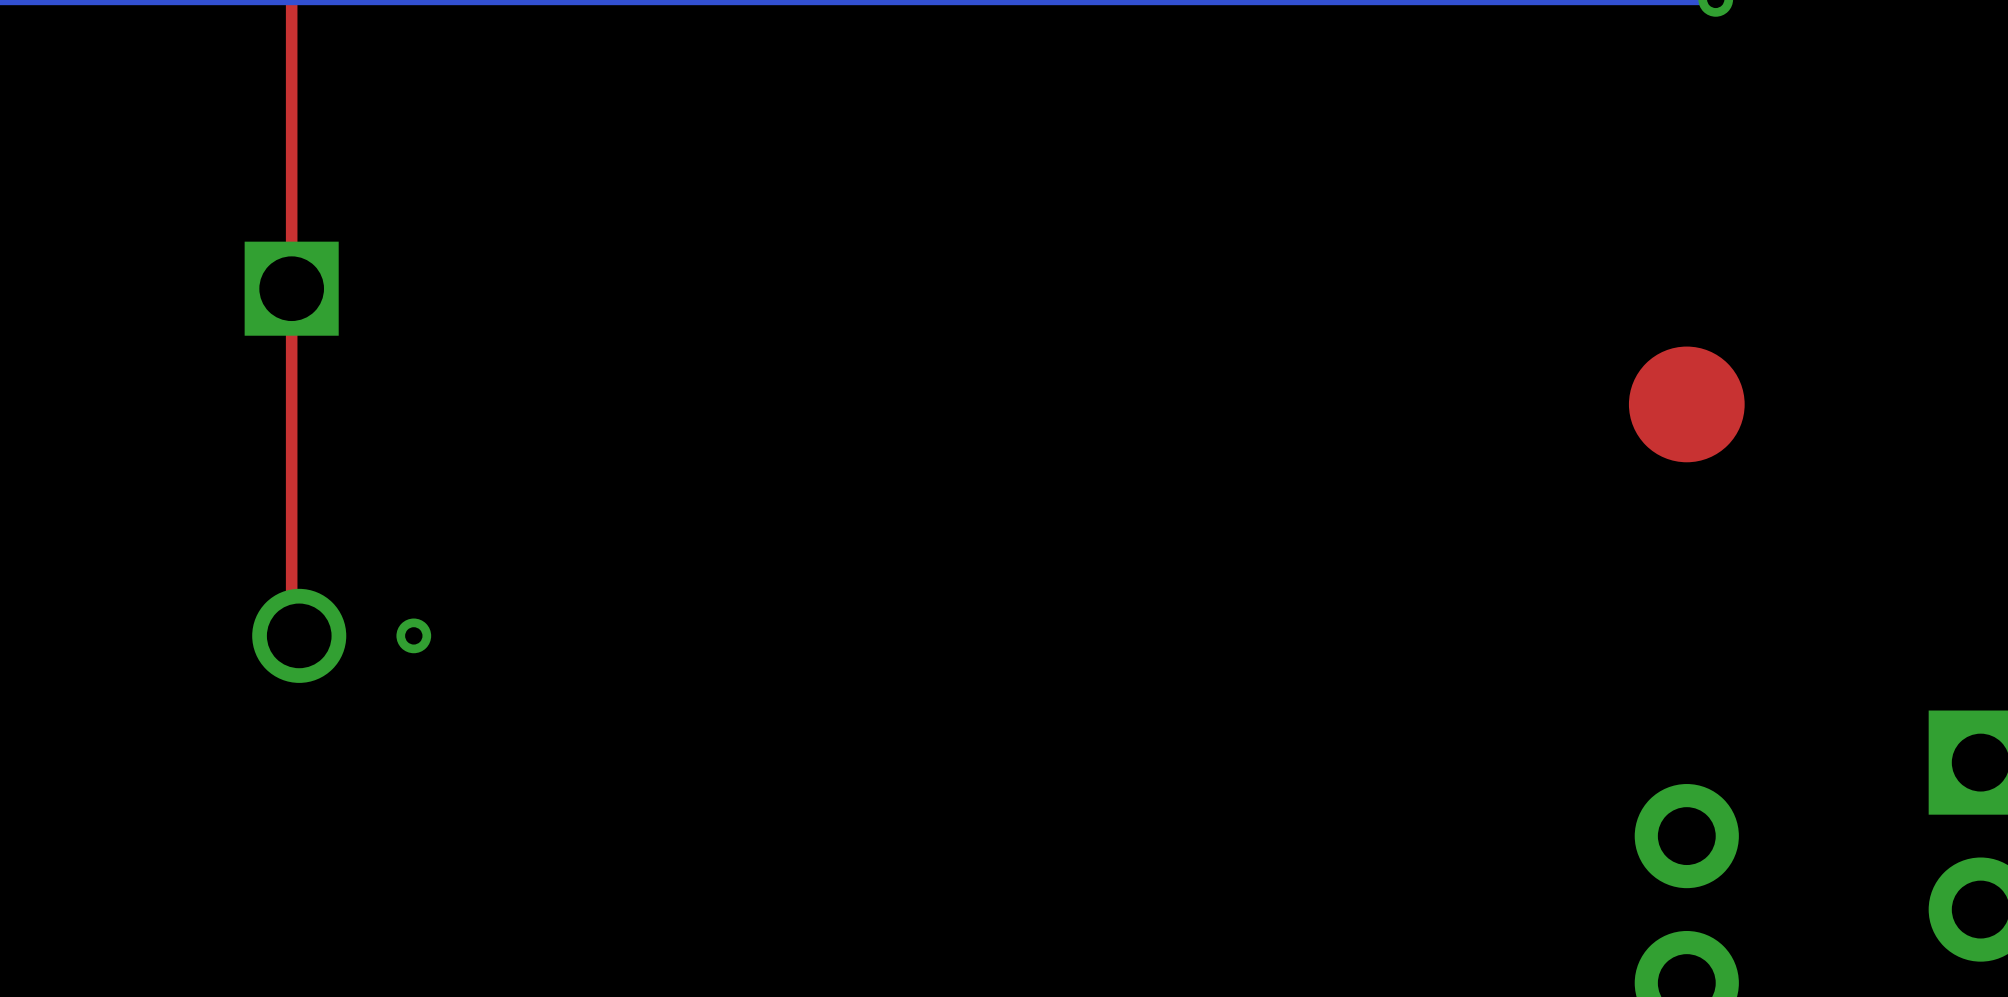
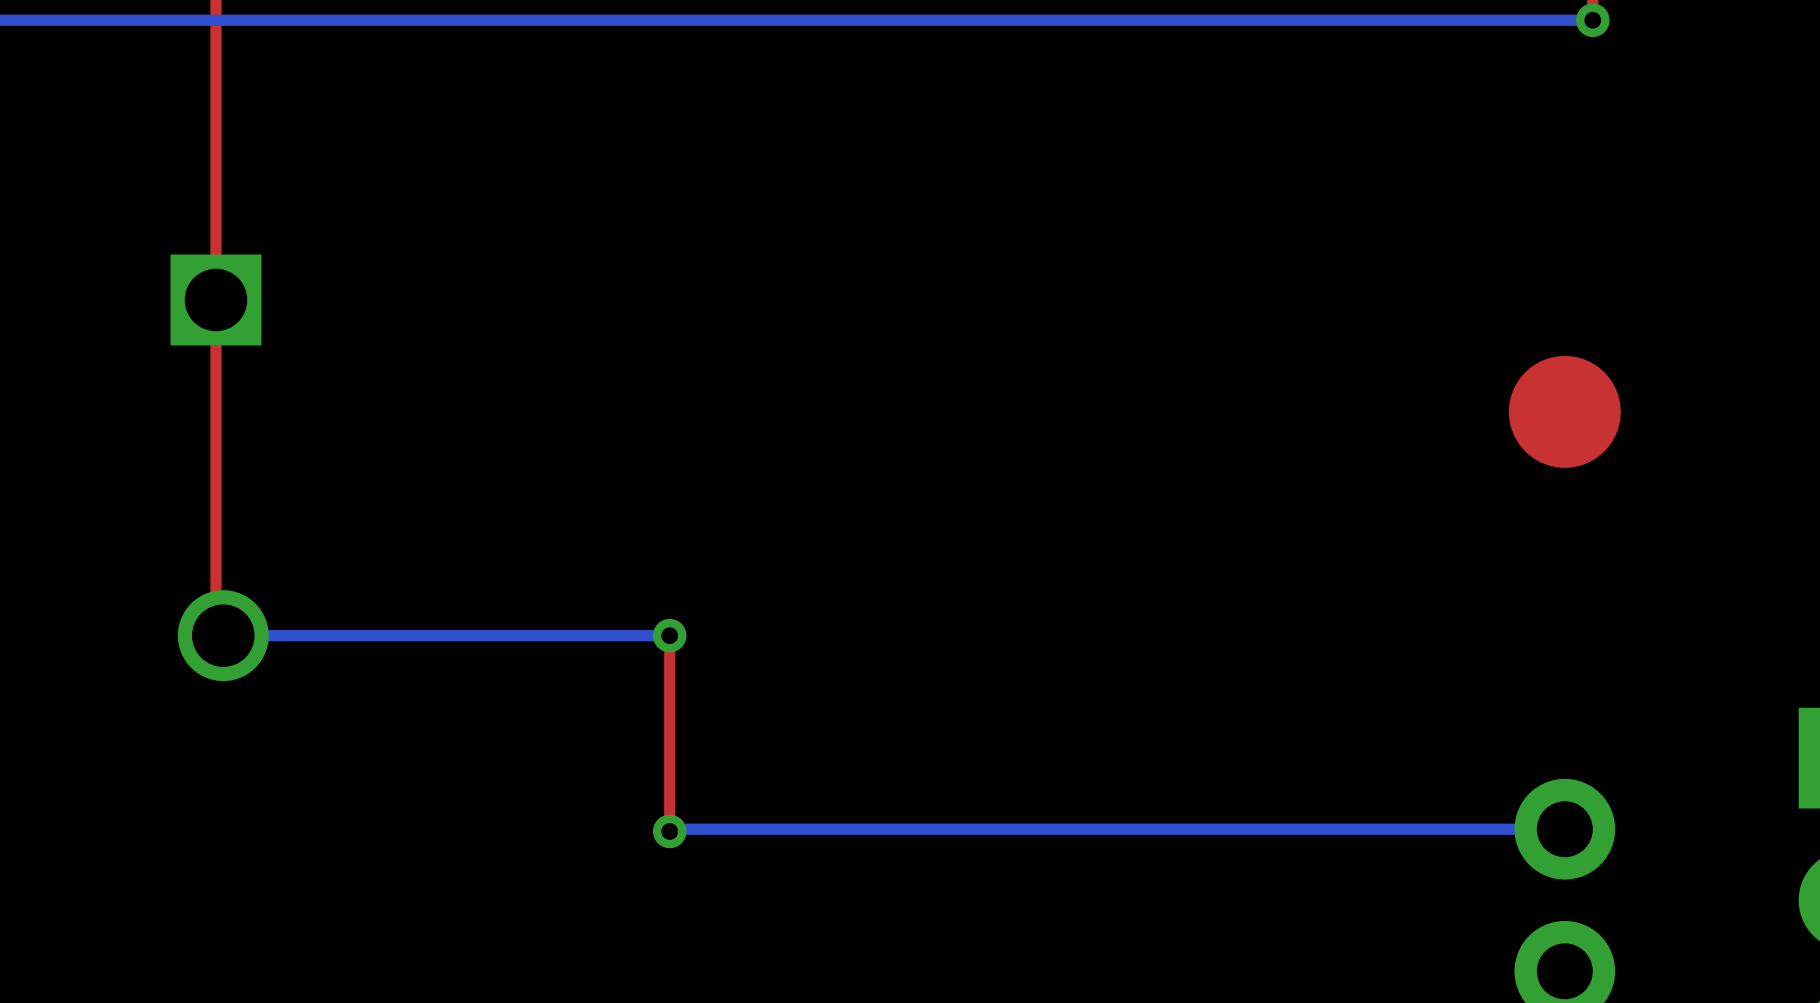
via: (413, 635) -> none
top track: none -> (669, 635) (669, 831)
bottom track: none -> (669, 635) (223, 635)
via: none -> (669, 635)
bottom track: none -> (1564, 829) (671, 829) (669, 831)
via: none -> (669, 831)

